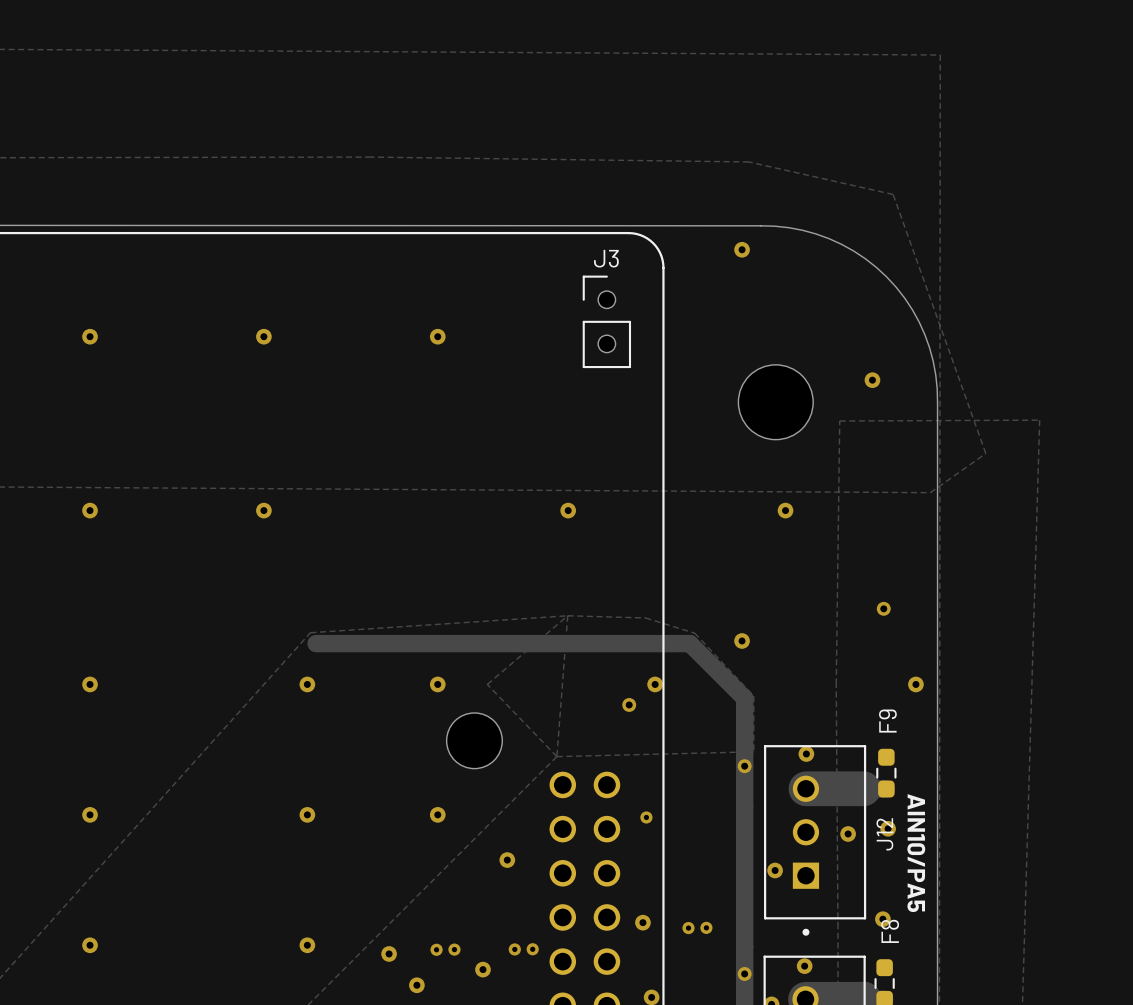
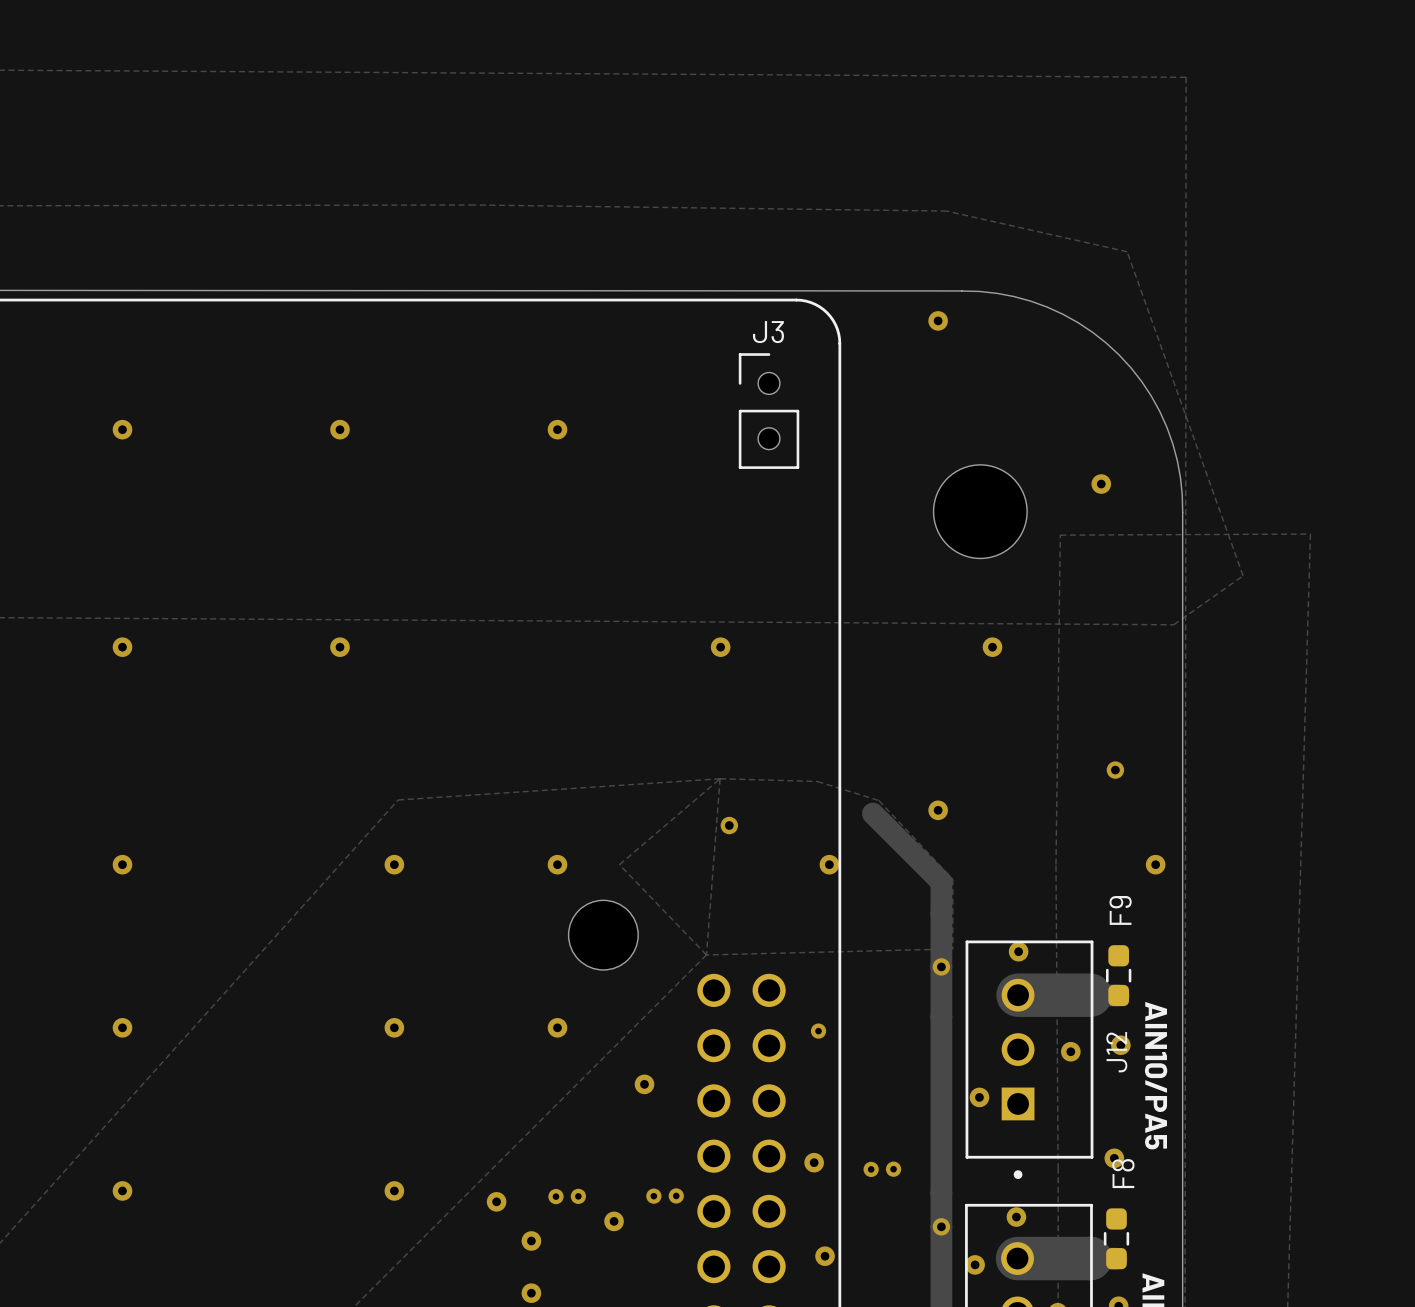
track: (316, 643) (689, 643) -> none
via position: (629, 704) -> (729, 825)

